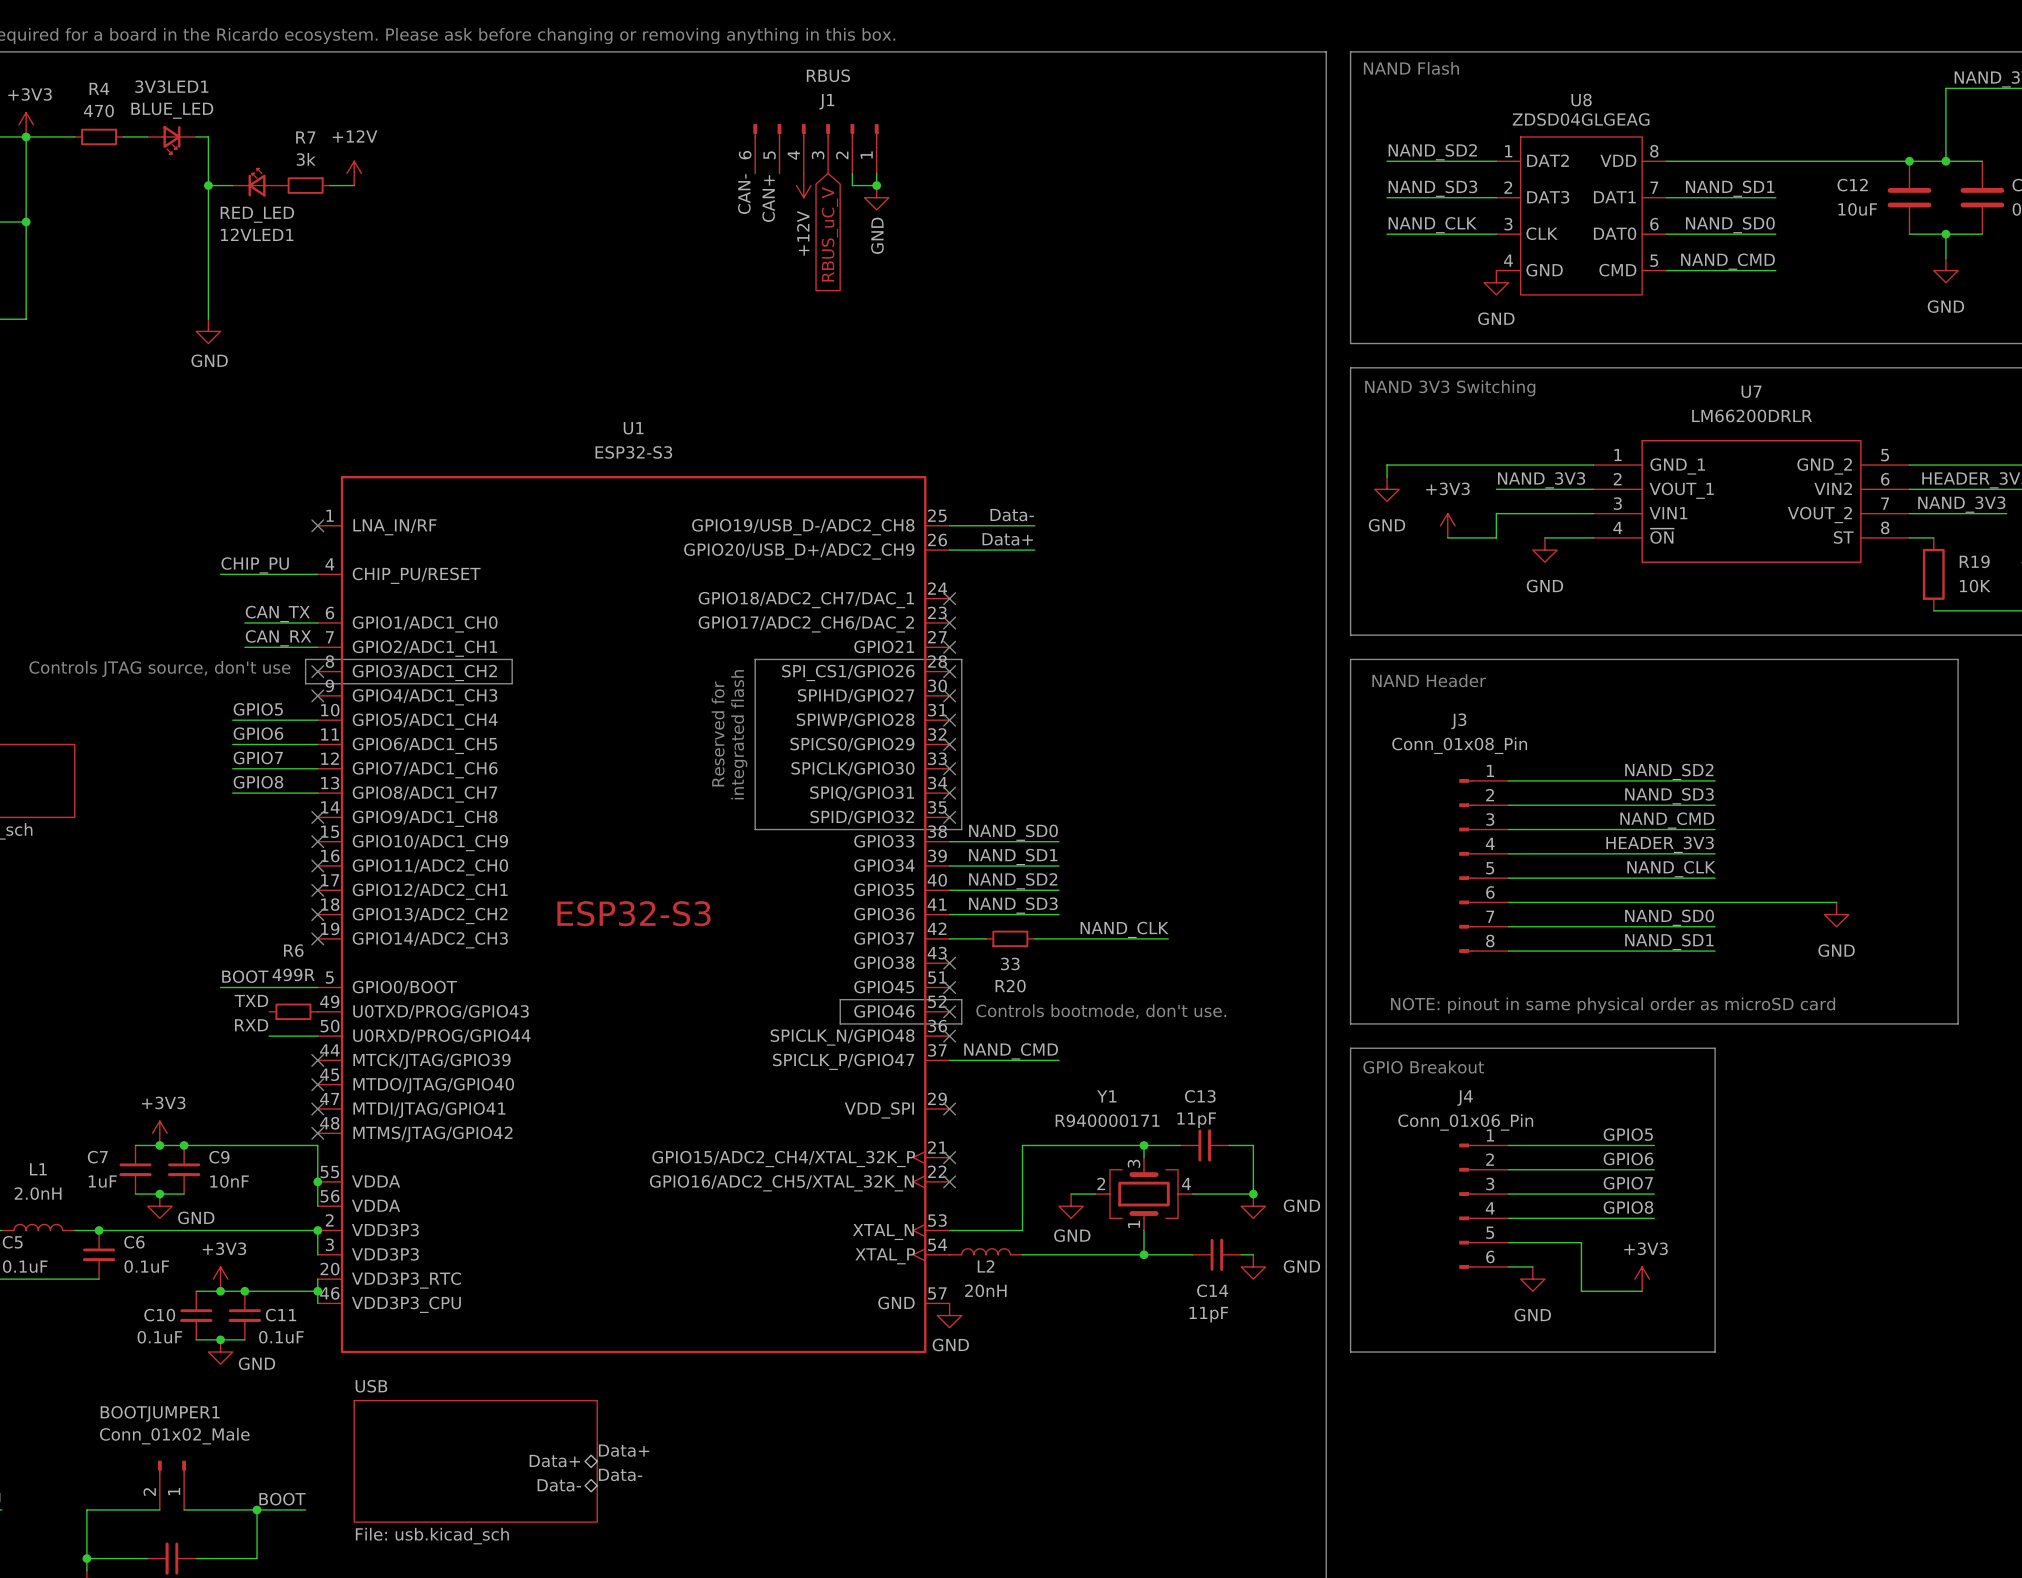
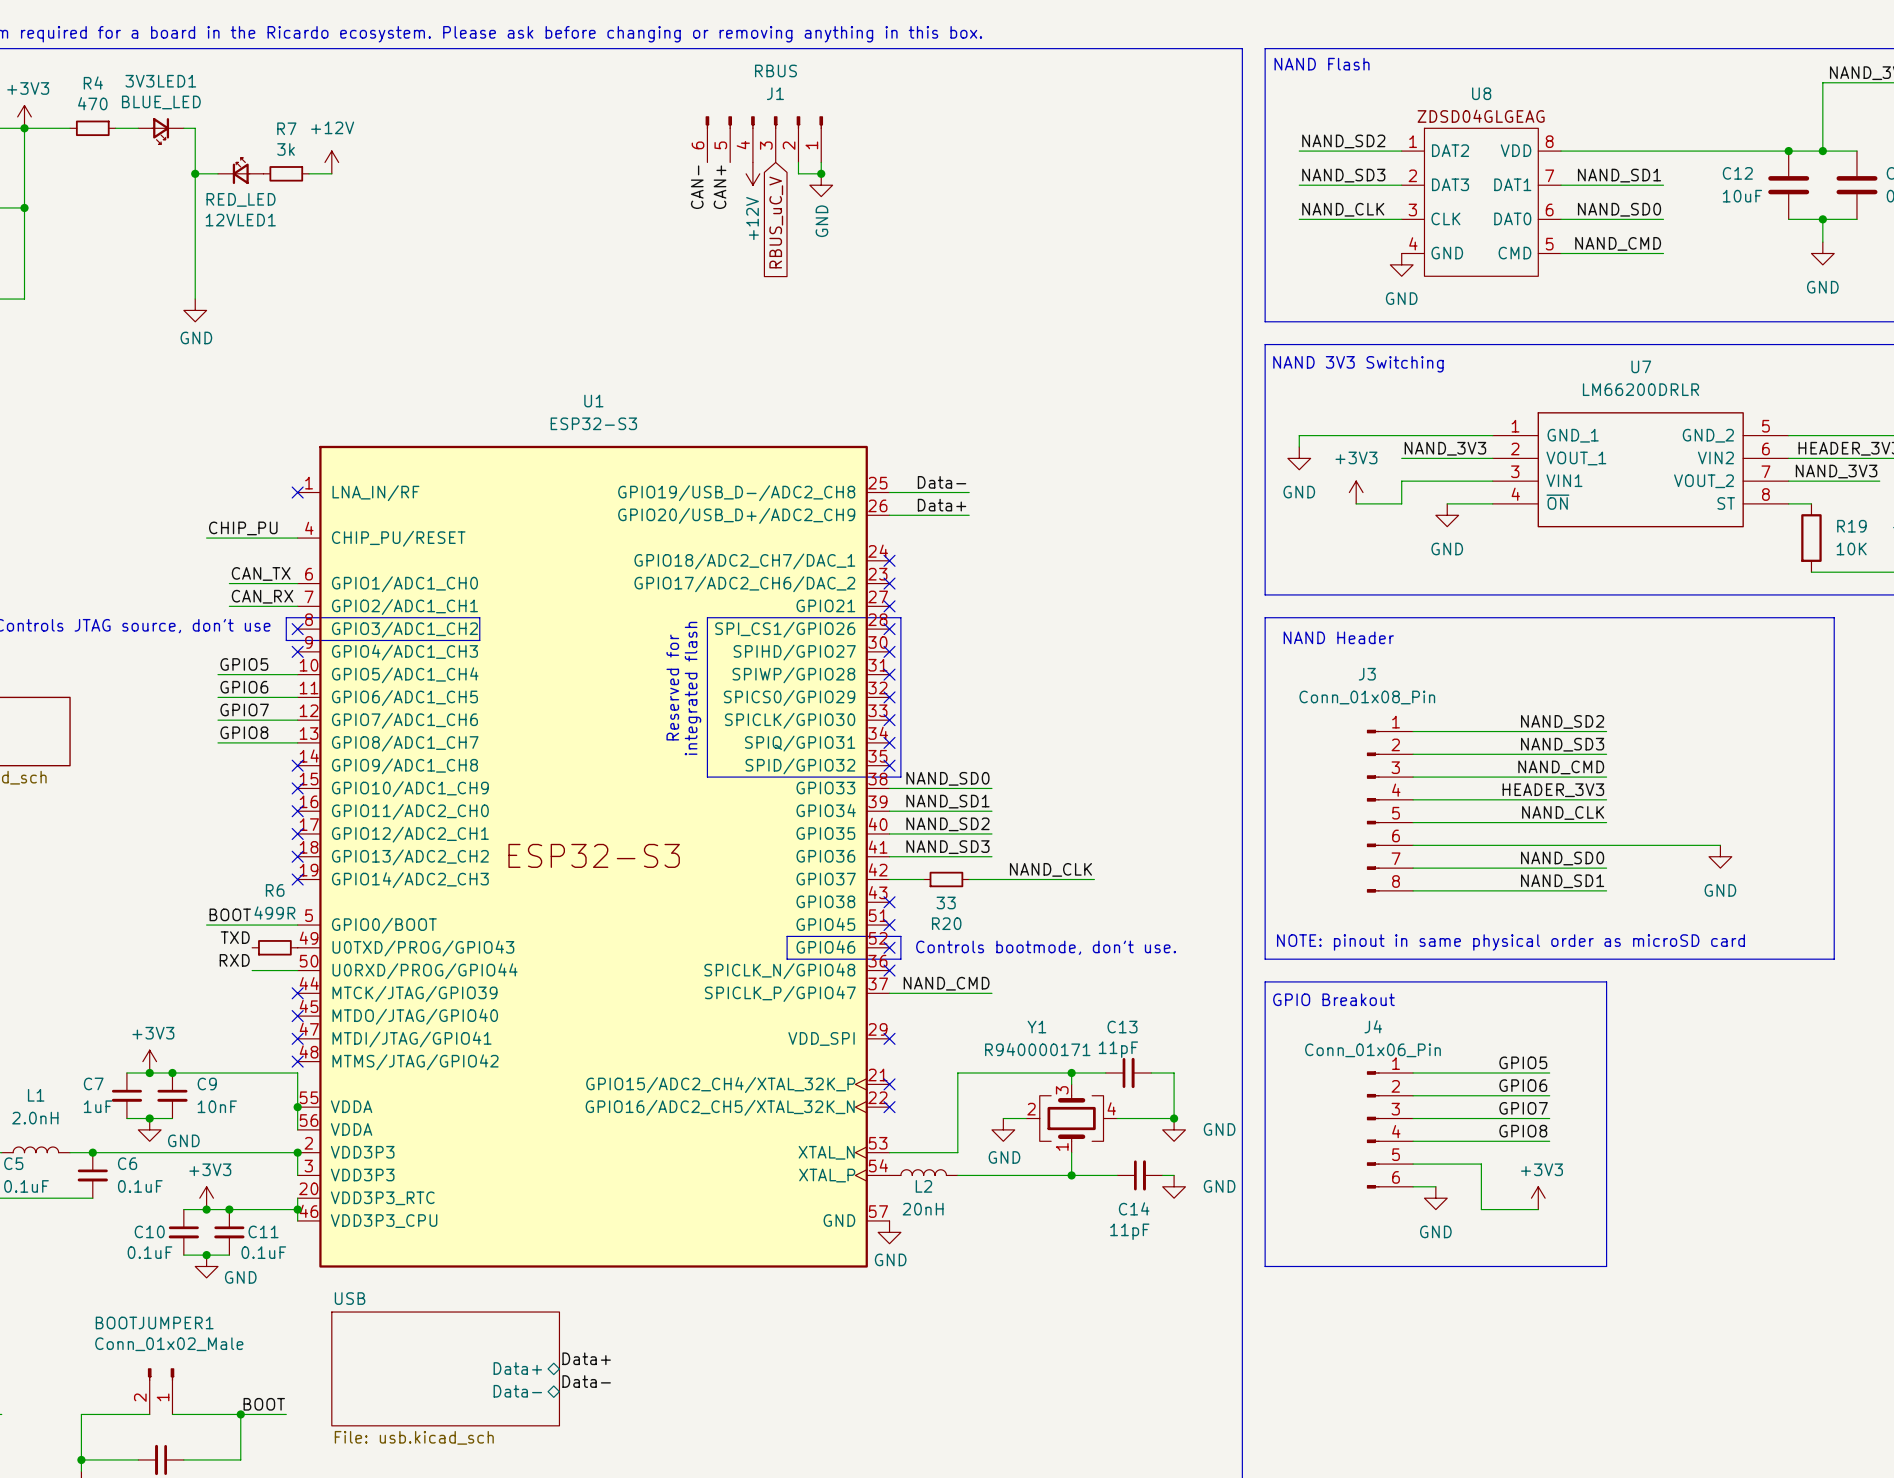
U8 value: ZDSD04GLGEAG (1581, 119) -> none
U8 text: none -> ZDSD04GLGEAG (1481, 116)

